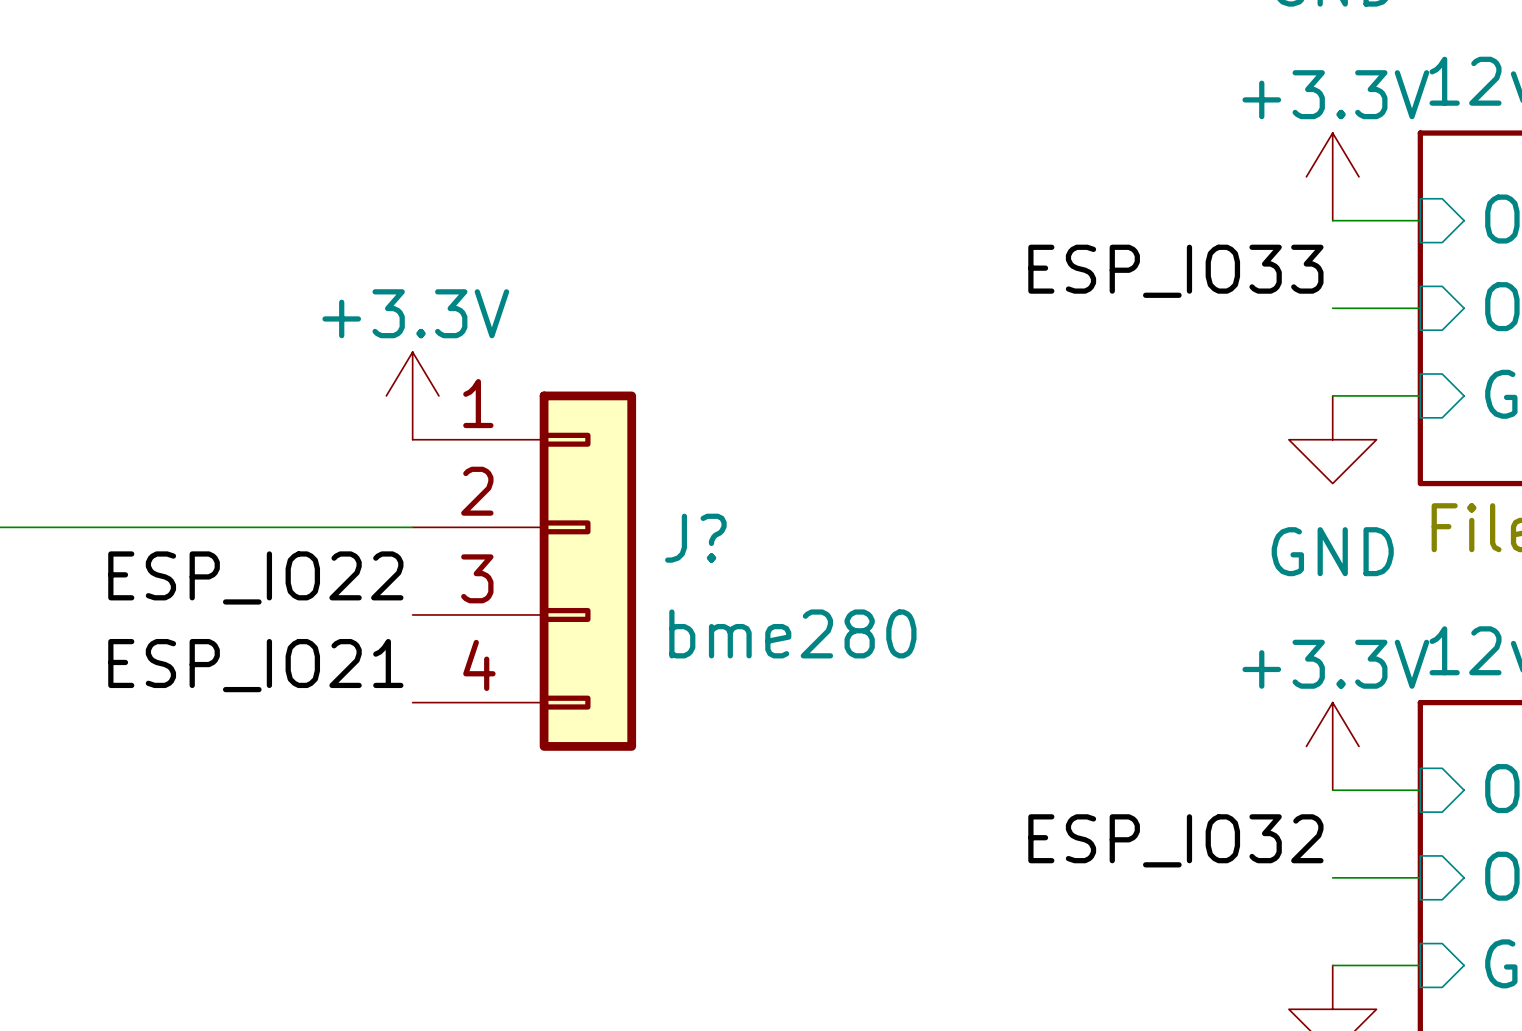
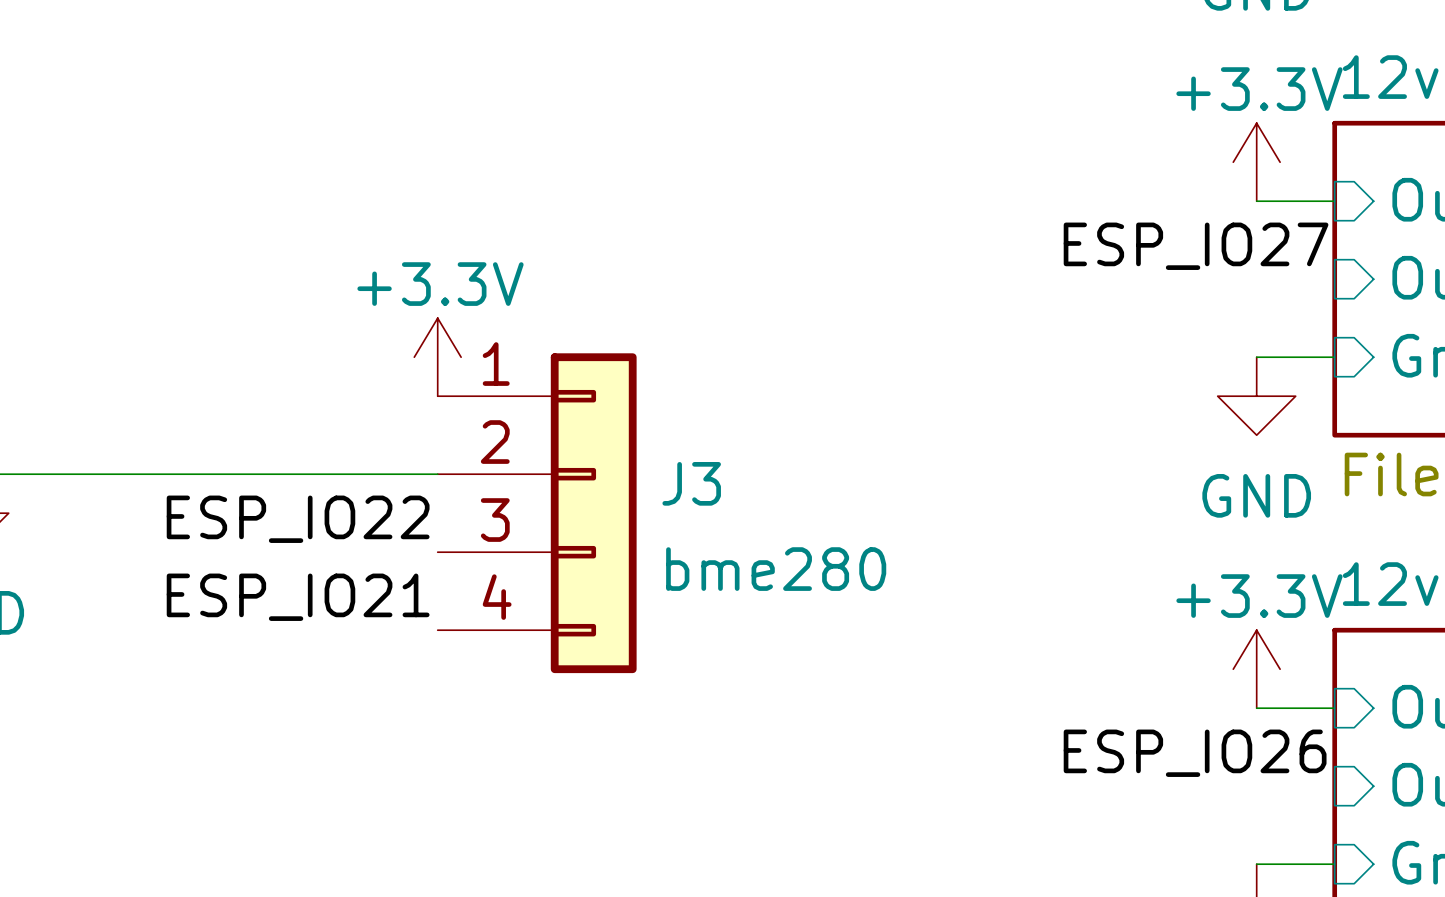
label: ESP_IO33 (1175, 271) -> ESP_IO27 (1196, 246)
wire: (1332, 308) (1420, 308) -> none
J? name: J? (695, 538) -> J3 (691, 483)
label: ESP_IO32 (1175, 840) -> ESP_IO26 (1195, 753)
wire: (1332, 877) (1420, 877) -> none

